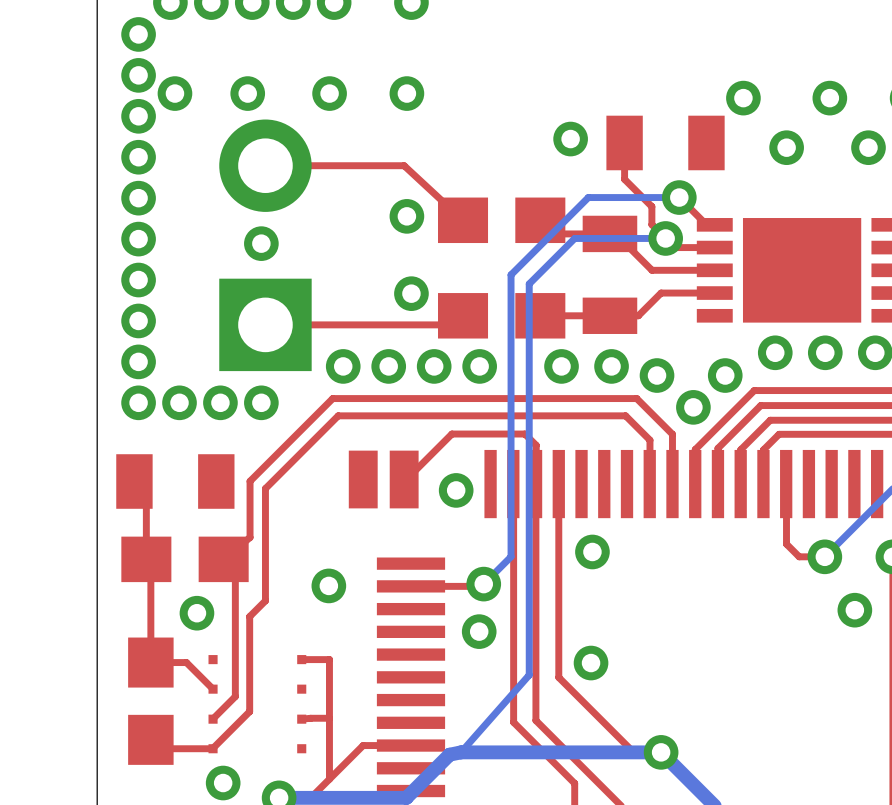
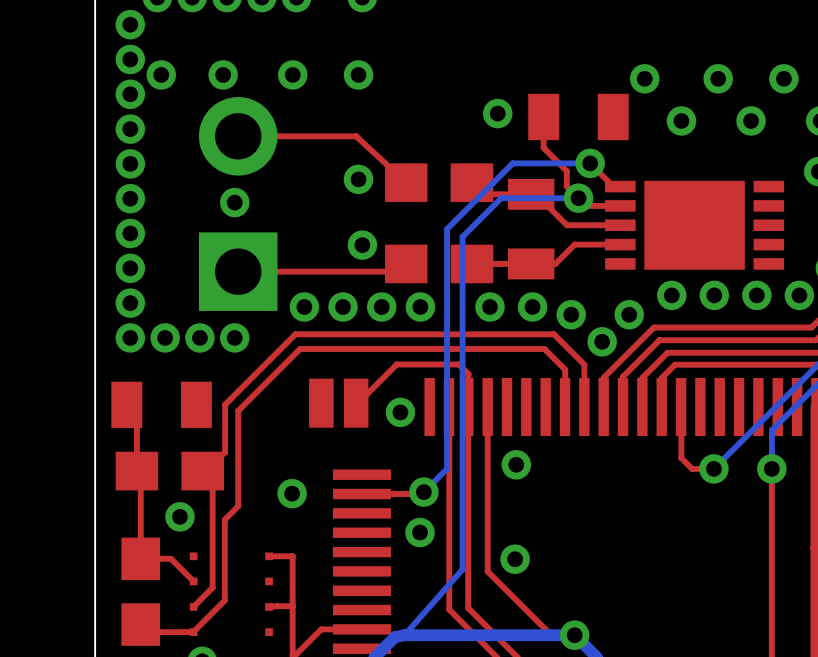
via: (854, 610) -> none

